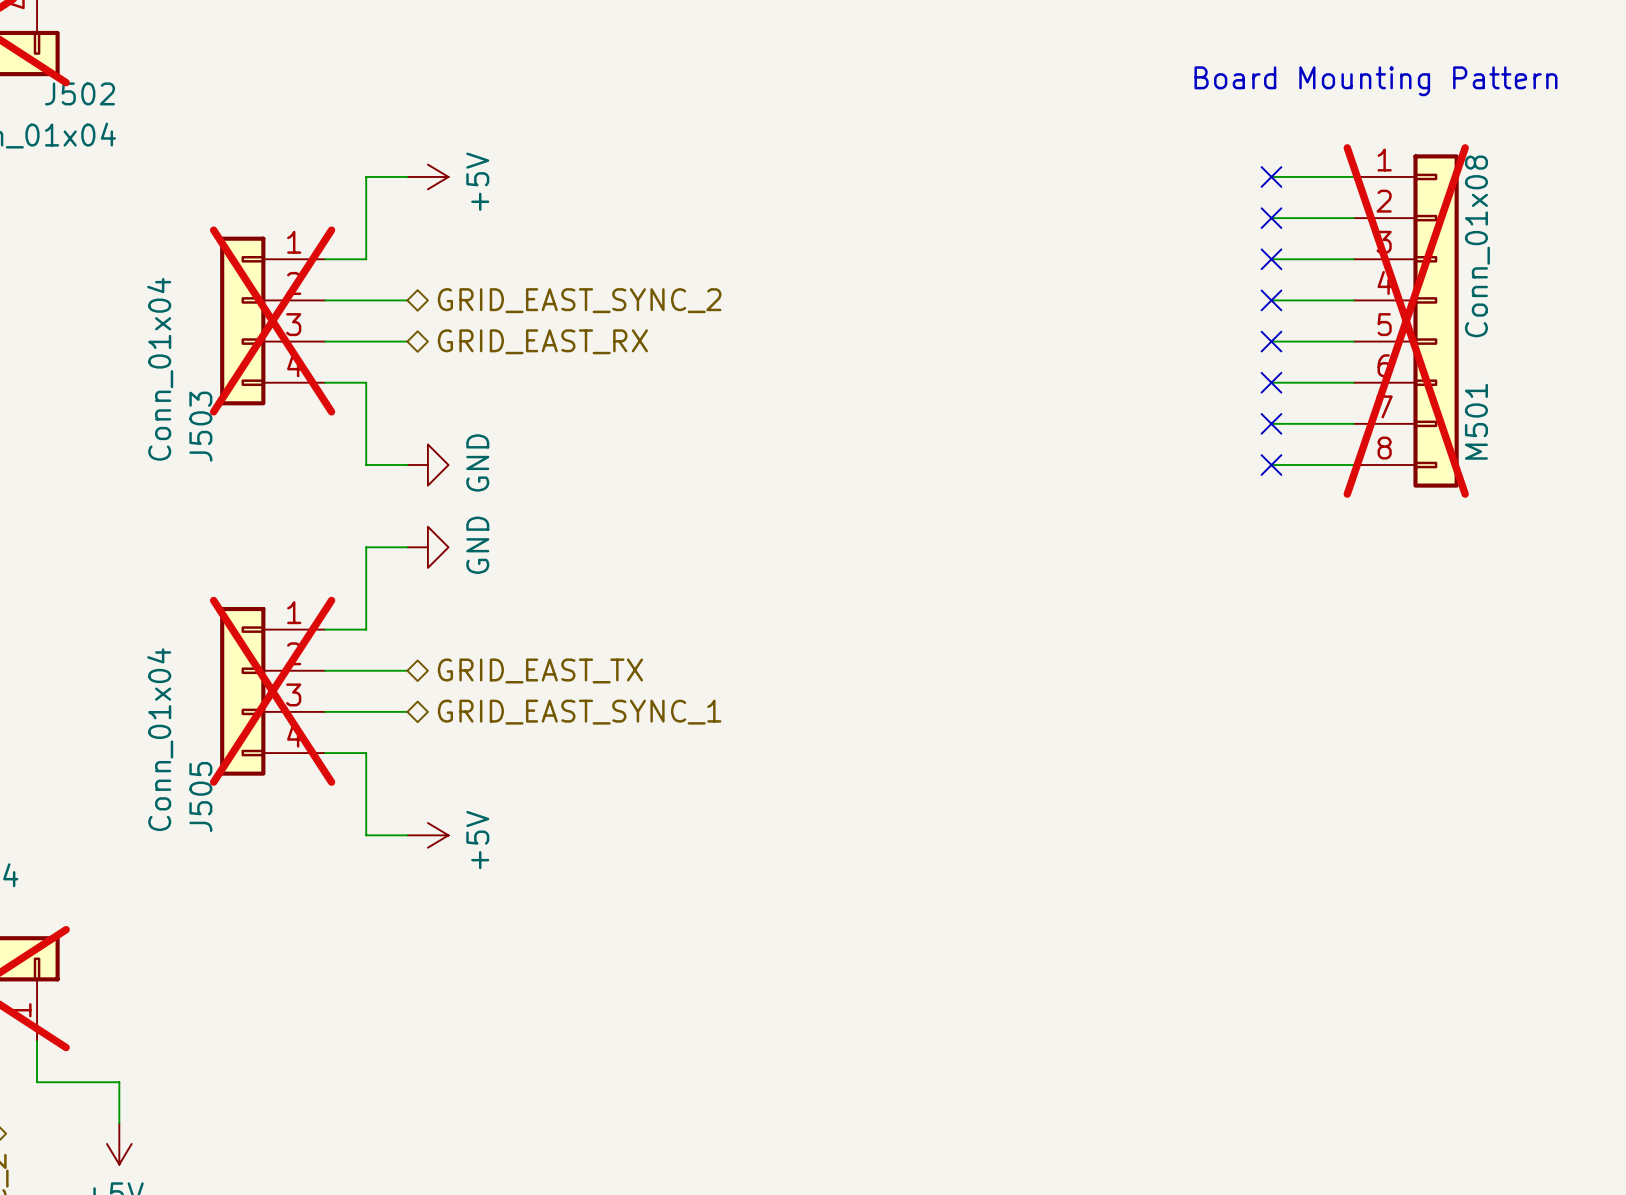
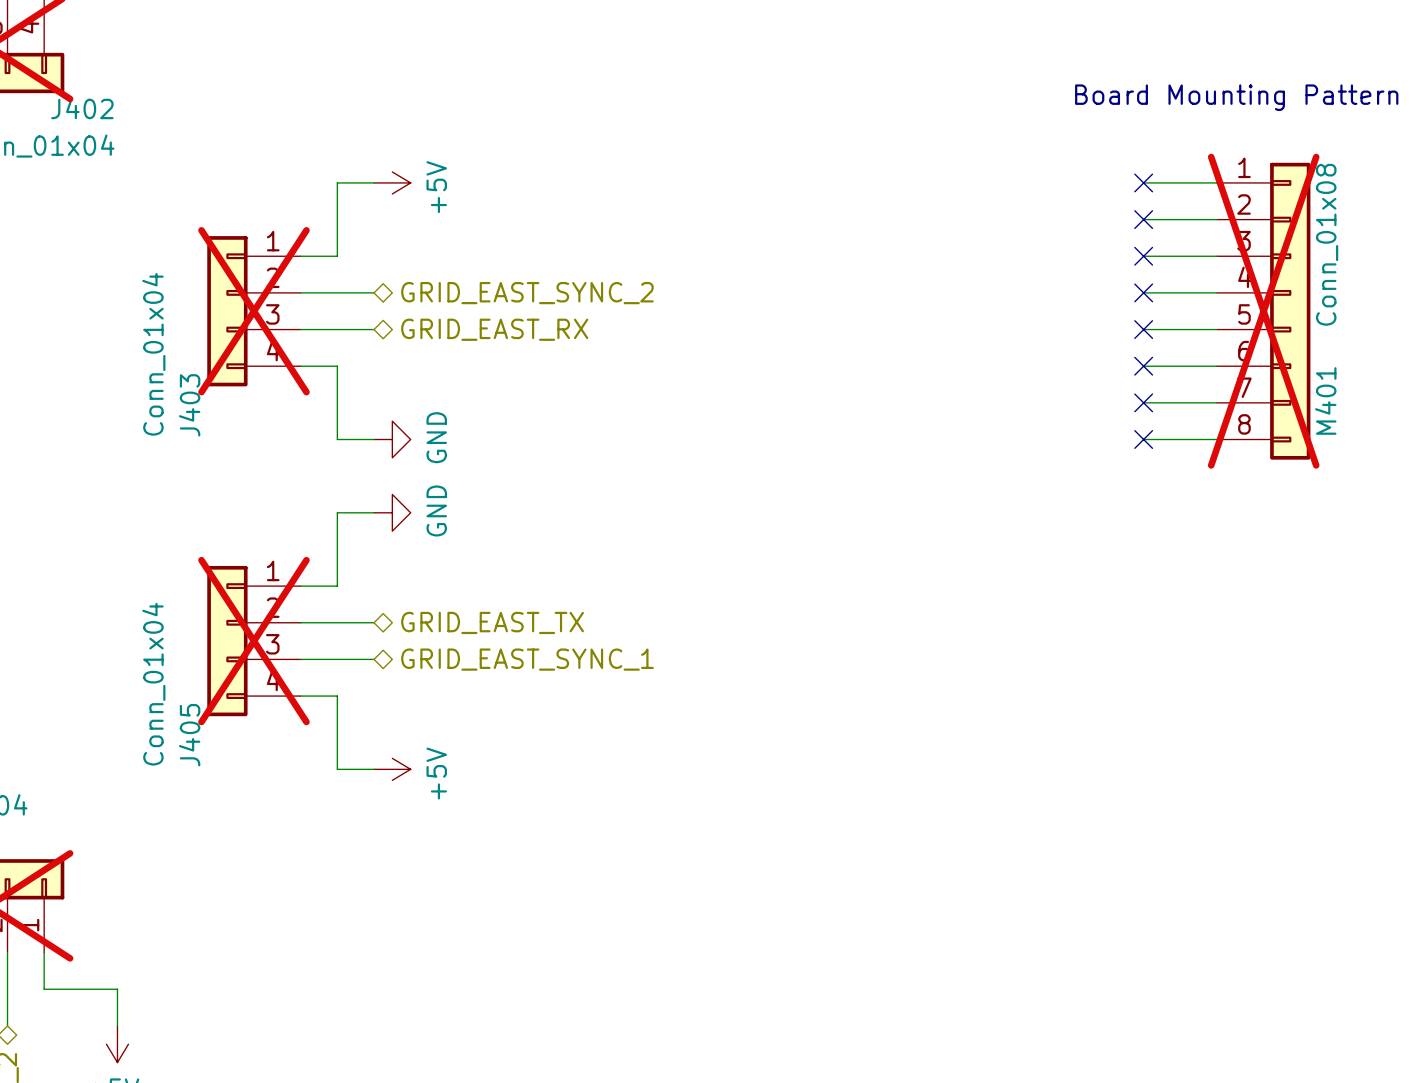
J502 name: J502 (79, 93) -> J402 (82, 108)
M501 name: M501 (1476, 421) -> M401 (1325, 400)
J503 name: J503 (200, 426) -> J403 (189, 405)
J505 name: J505 (200, 796) -> J405 (189, 735)

